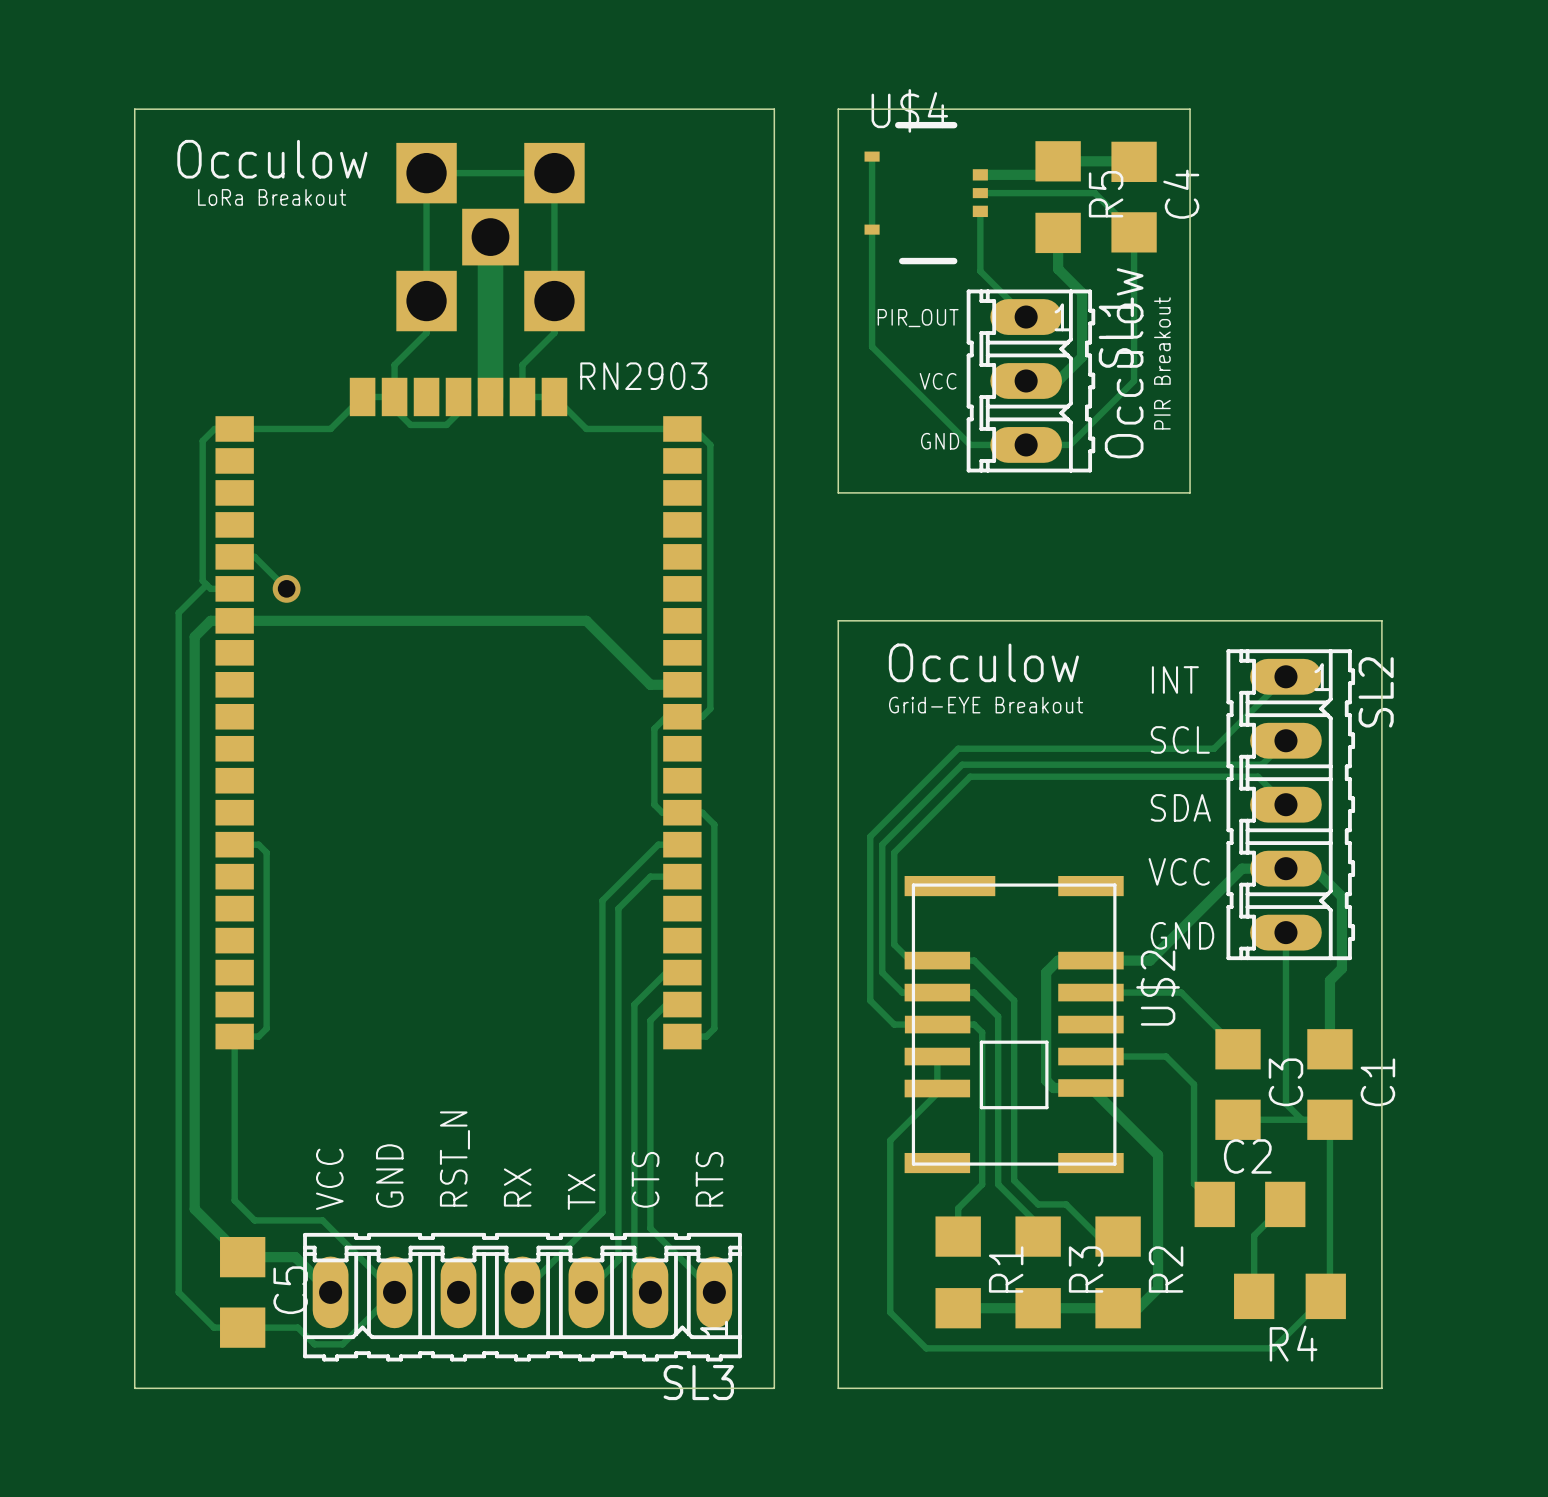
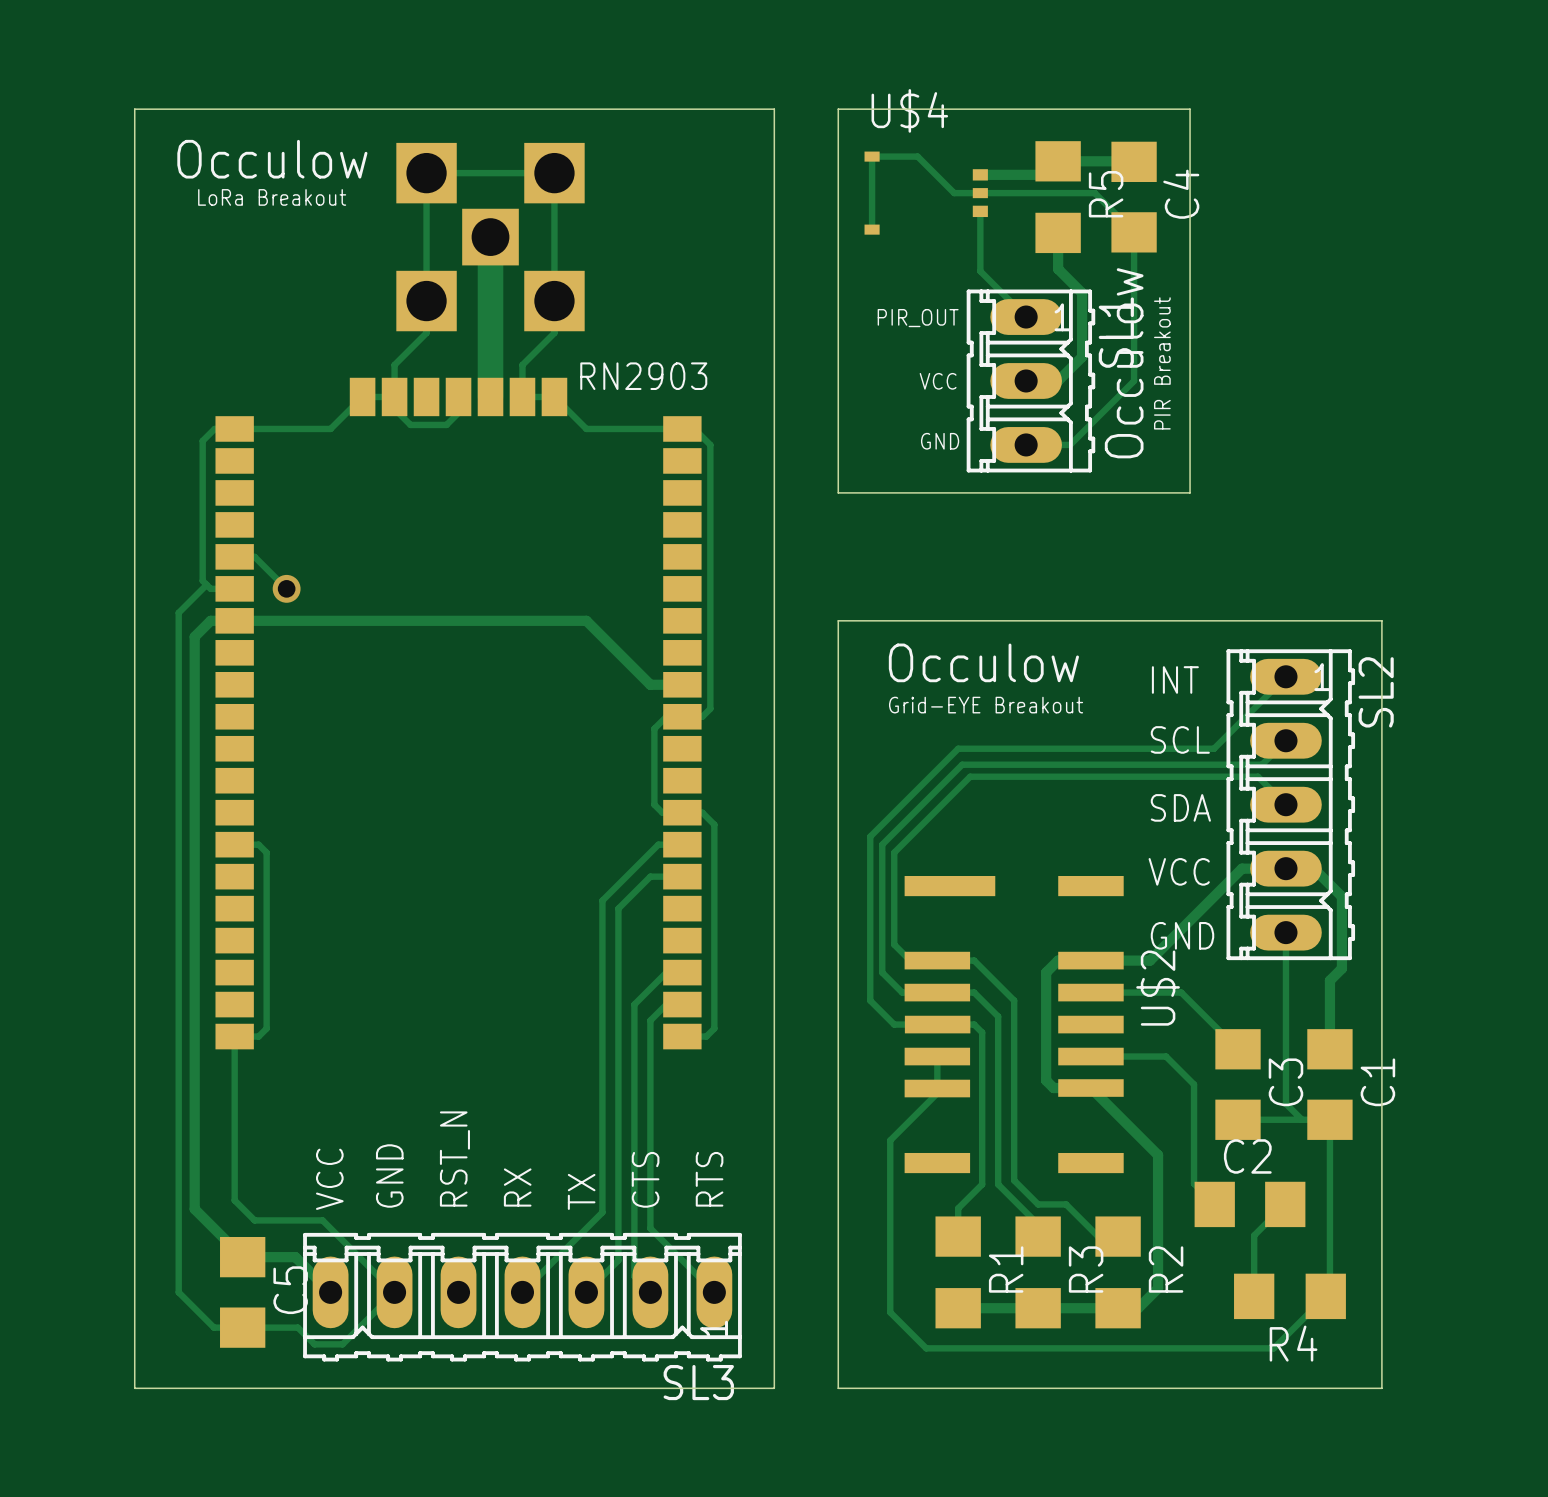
line: (898, 125) (954, 125) -> none
track: none -> (872, 156) (917, 156) (954, 193) (980, 193)
track: (872, 229) (872, 346) (970, 444) (1026, 444) -> none
line: (902, 261) (954, 261) -> none
U$2 footprint: [904, 875, 1124, 1174] -> [904, 875, 1124, 1174]

